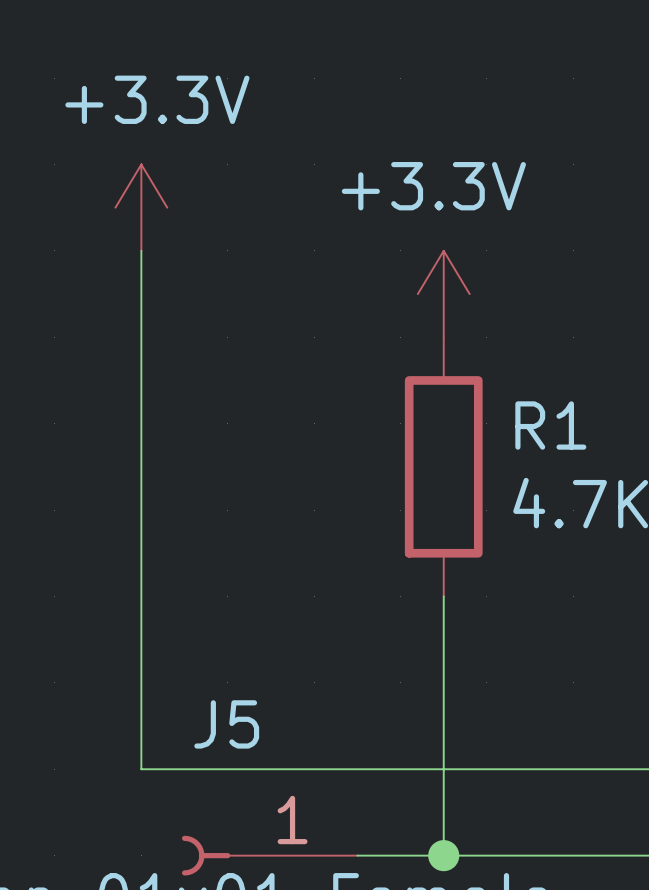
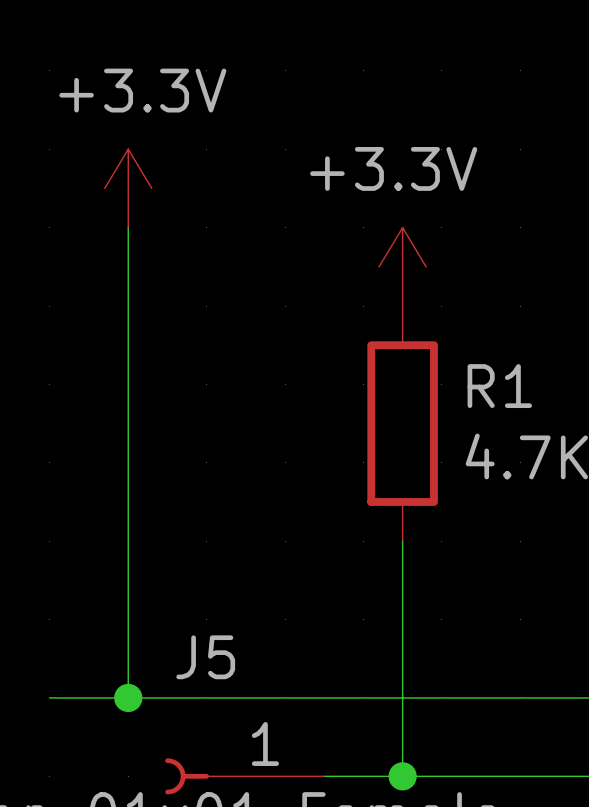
wire: none -> (49, 697) (128, 697)
junction: none -> (128, 697)

